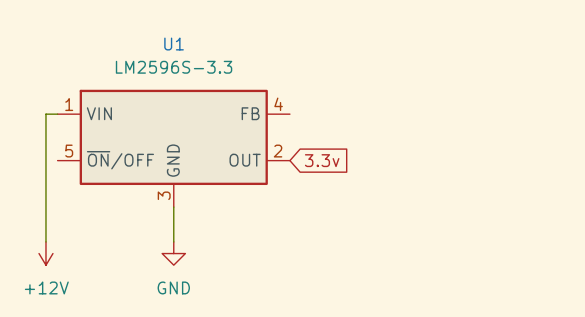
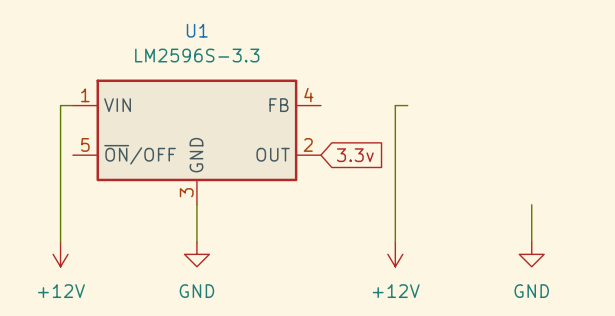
wire: none -> (407, 105) (395, 105) (395, 241)
wire: none -> (531, 204) (531, 241)
power symbol: none -> +12V (395, 254)
power symbol: none -> GND (531, 254)

